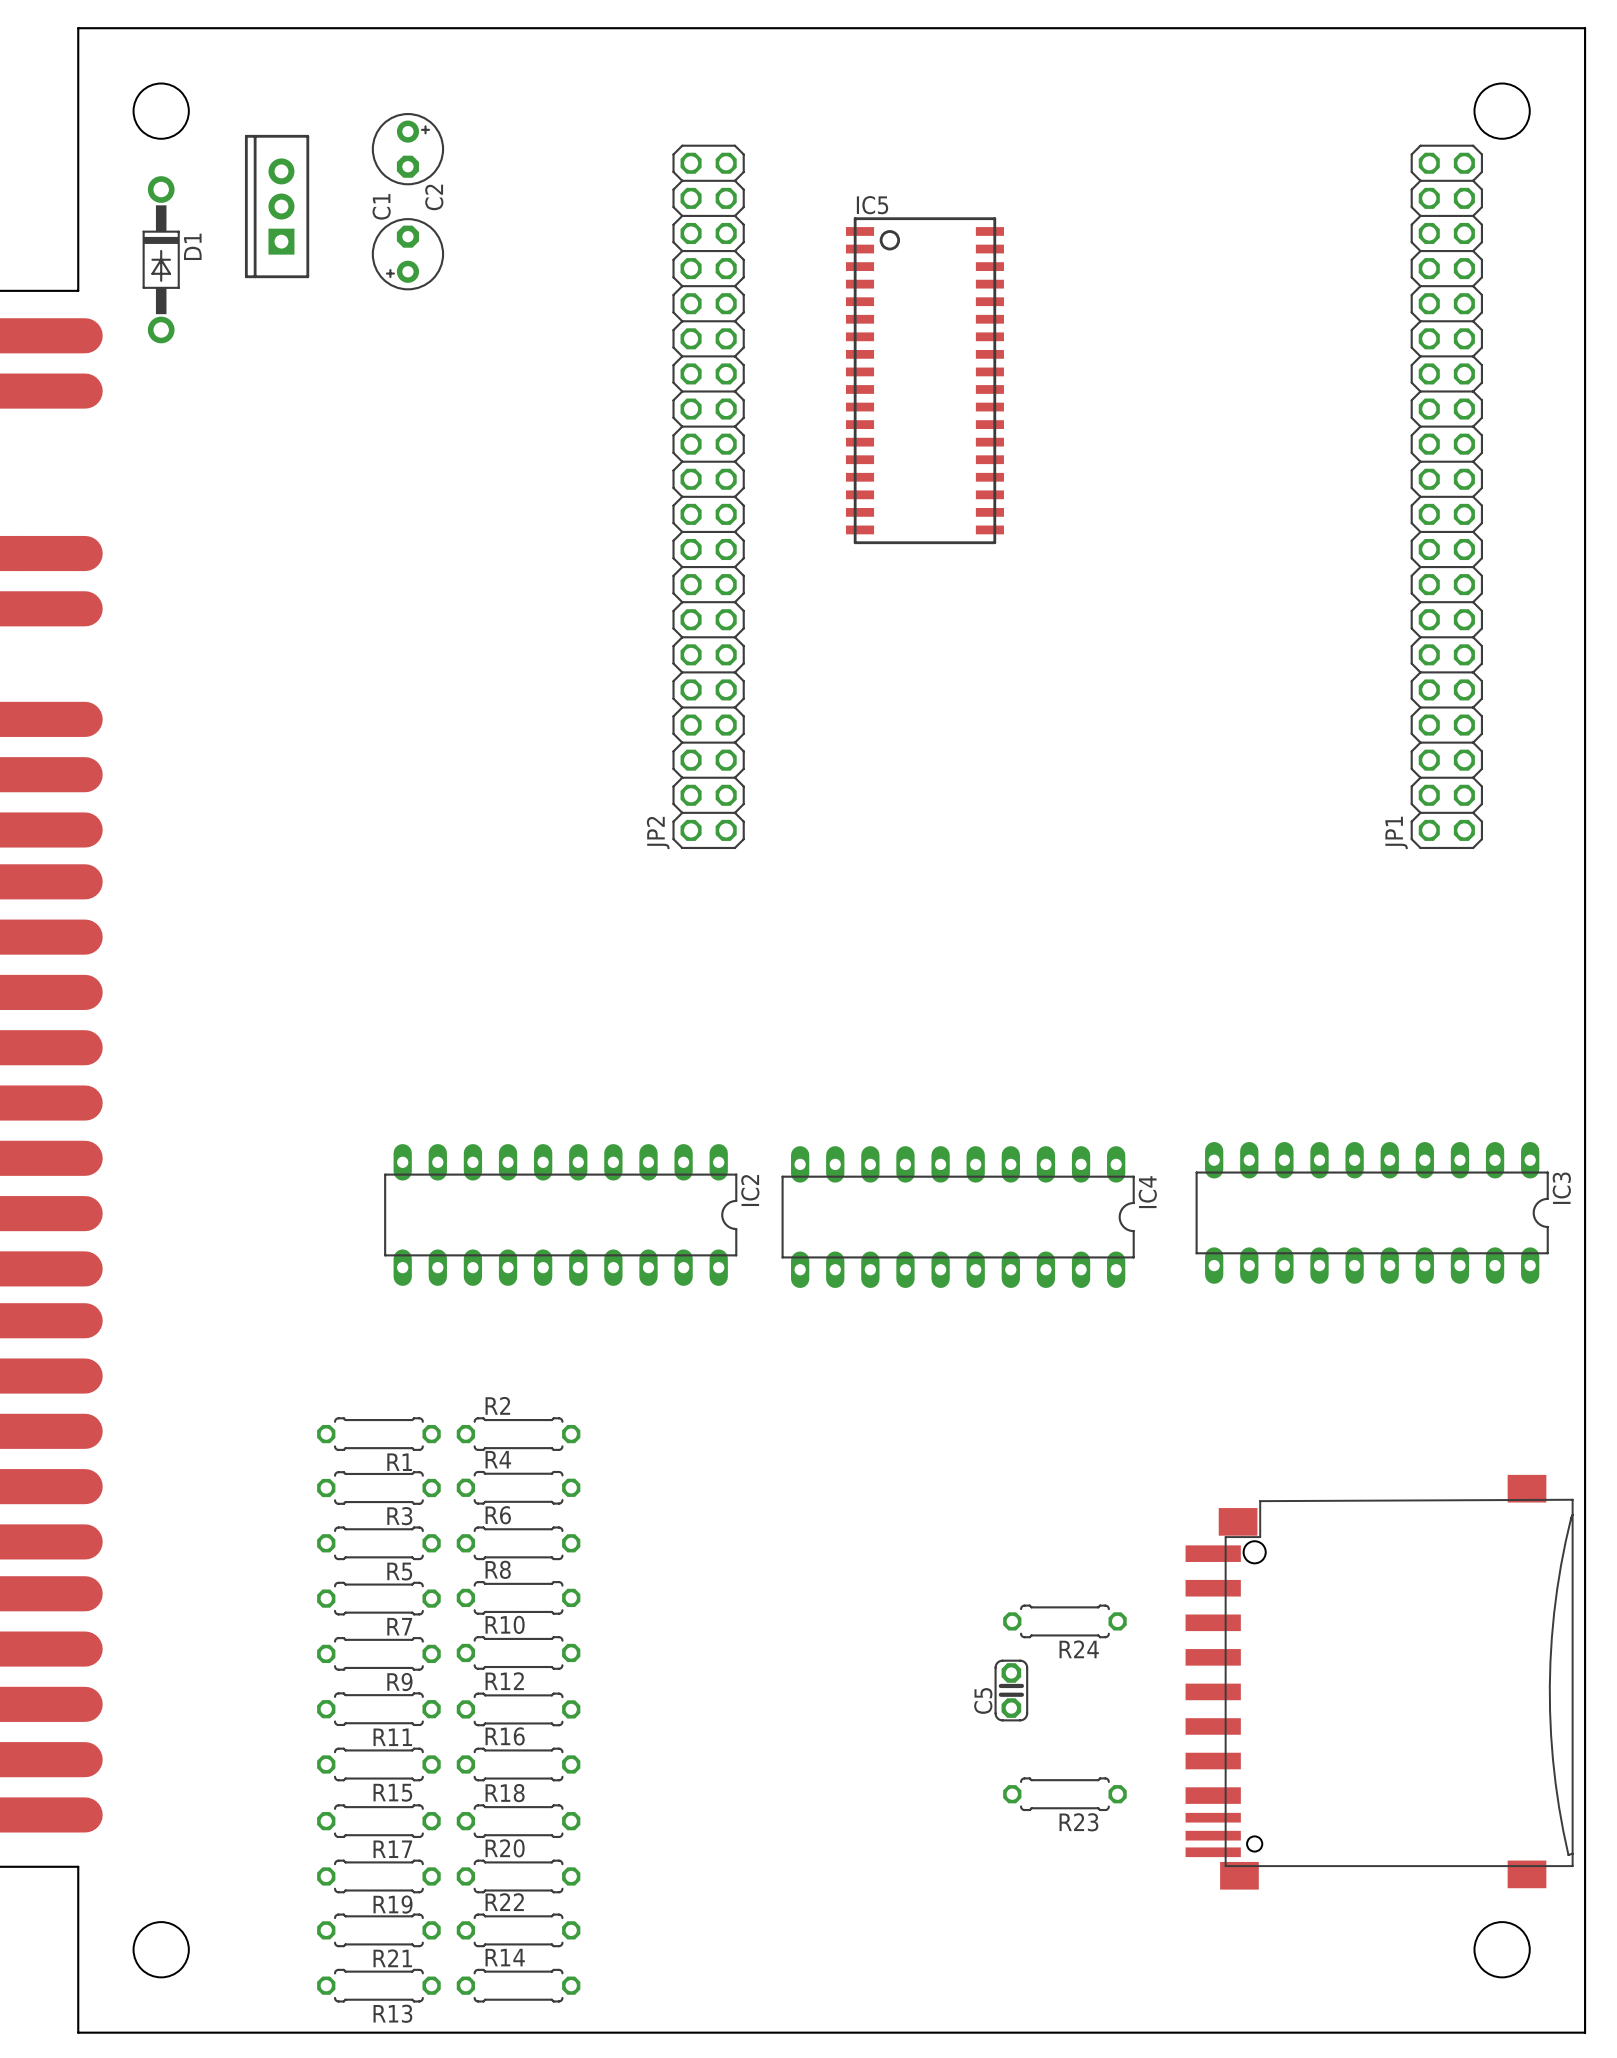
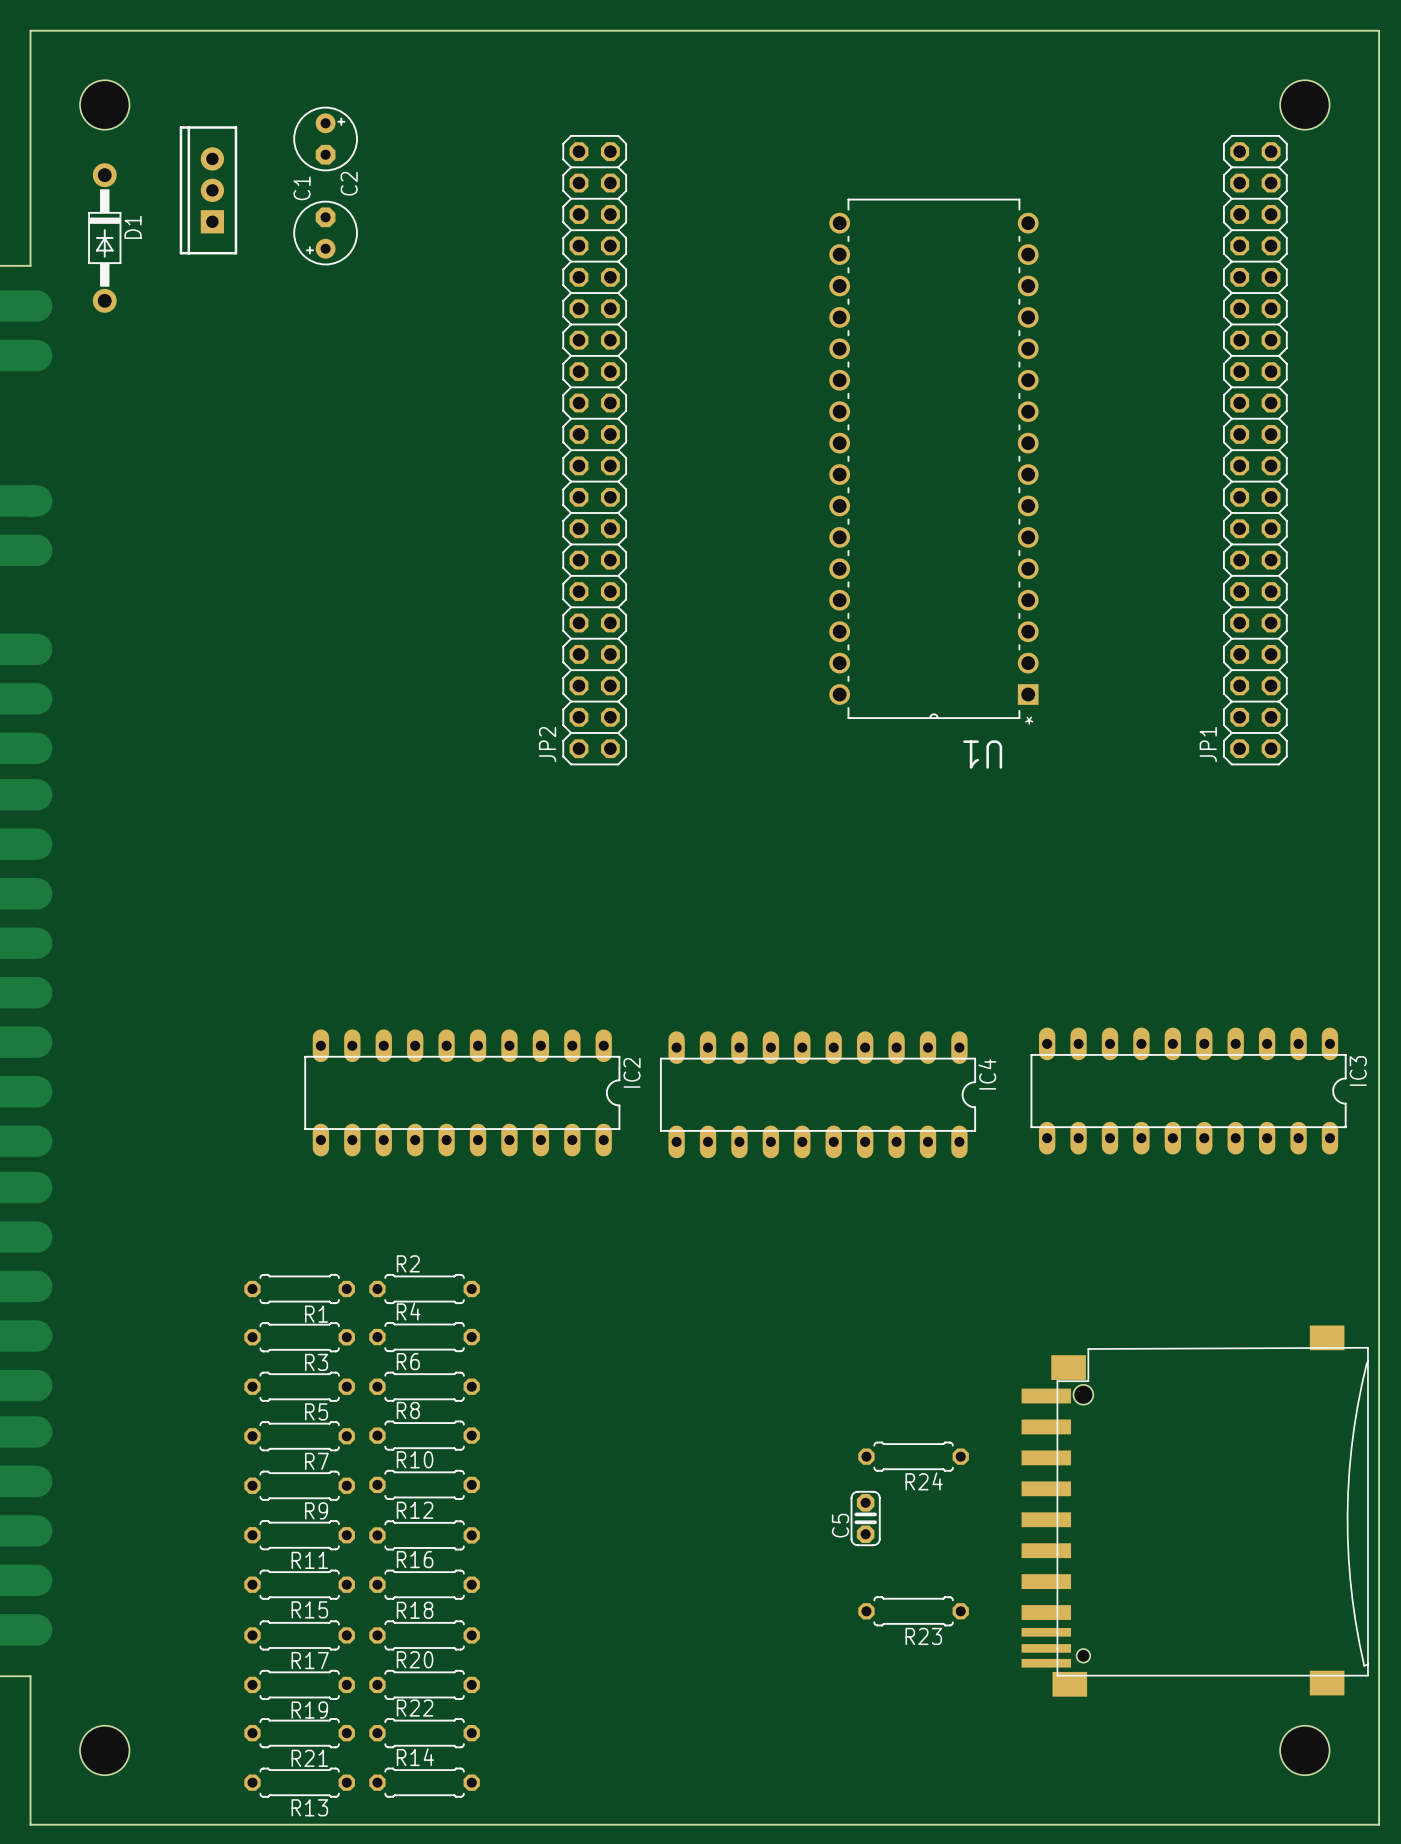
IC5: (924, 380) -> none
U1: none -> (933, 458)

